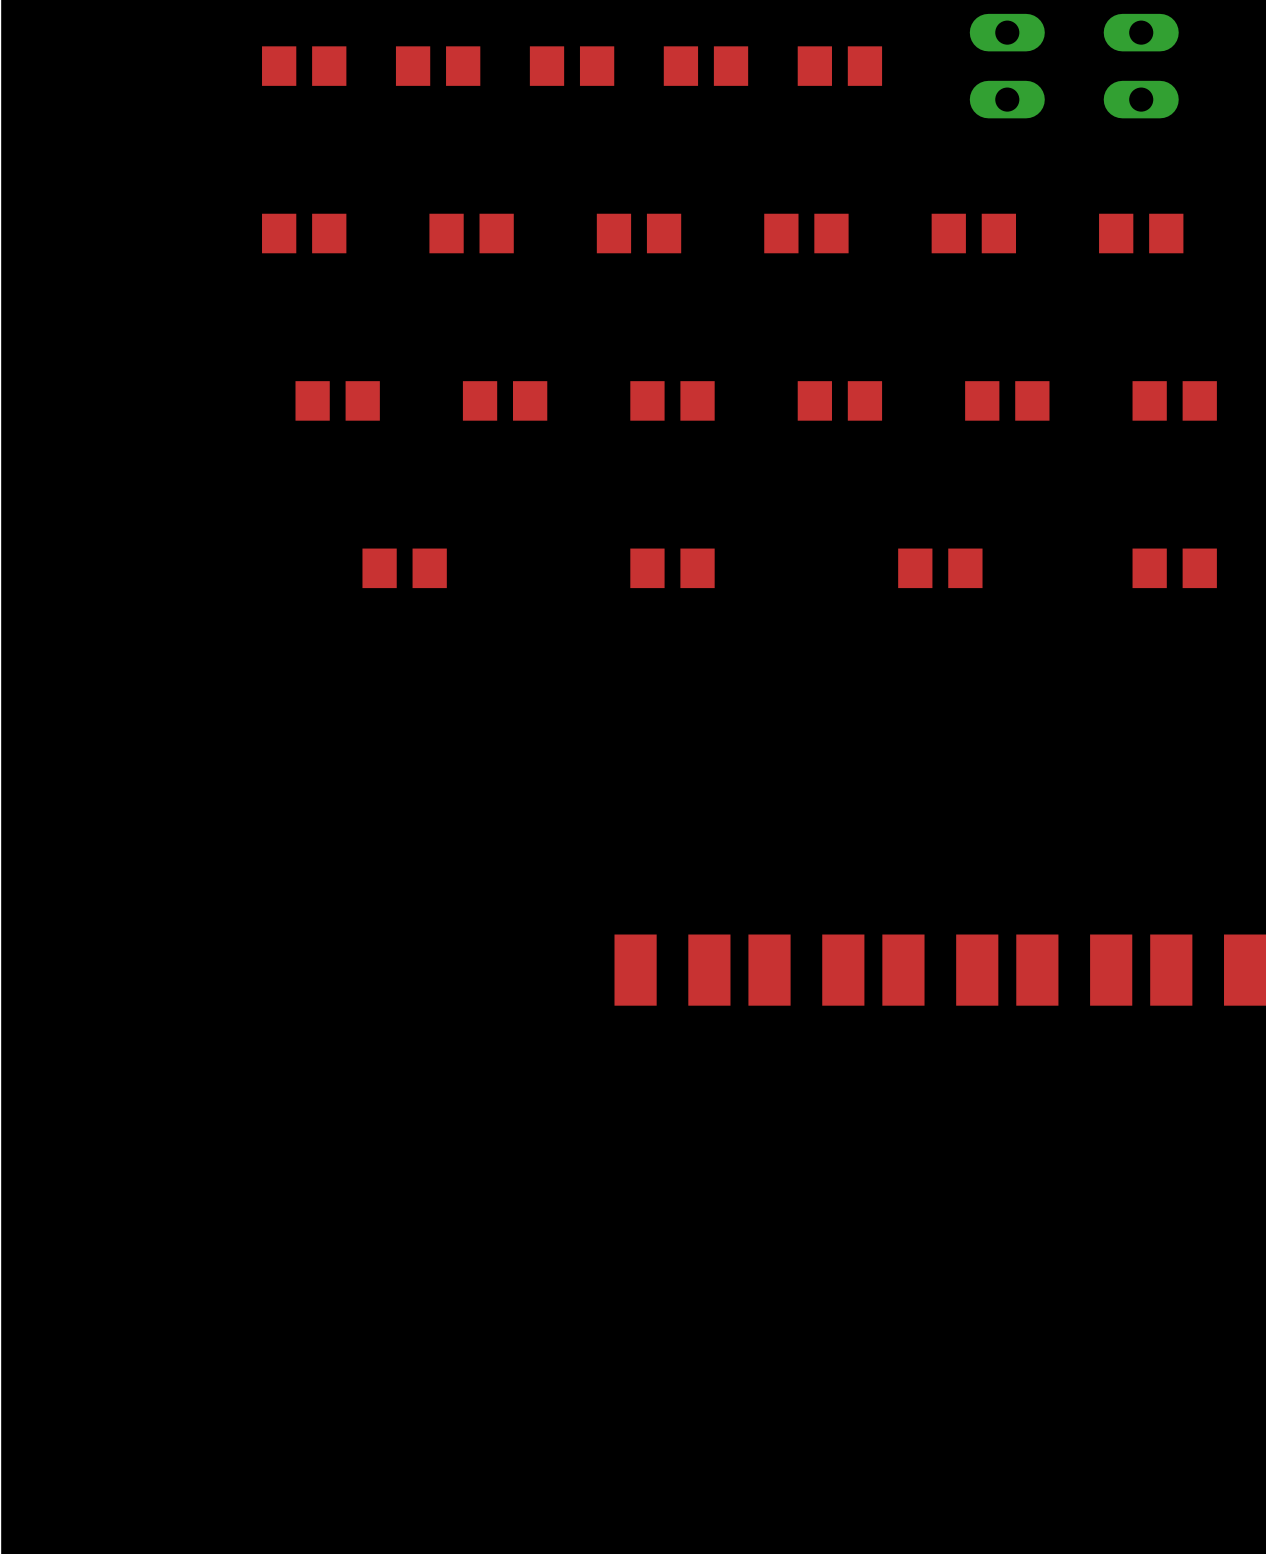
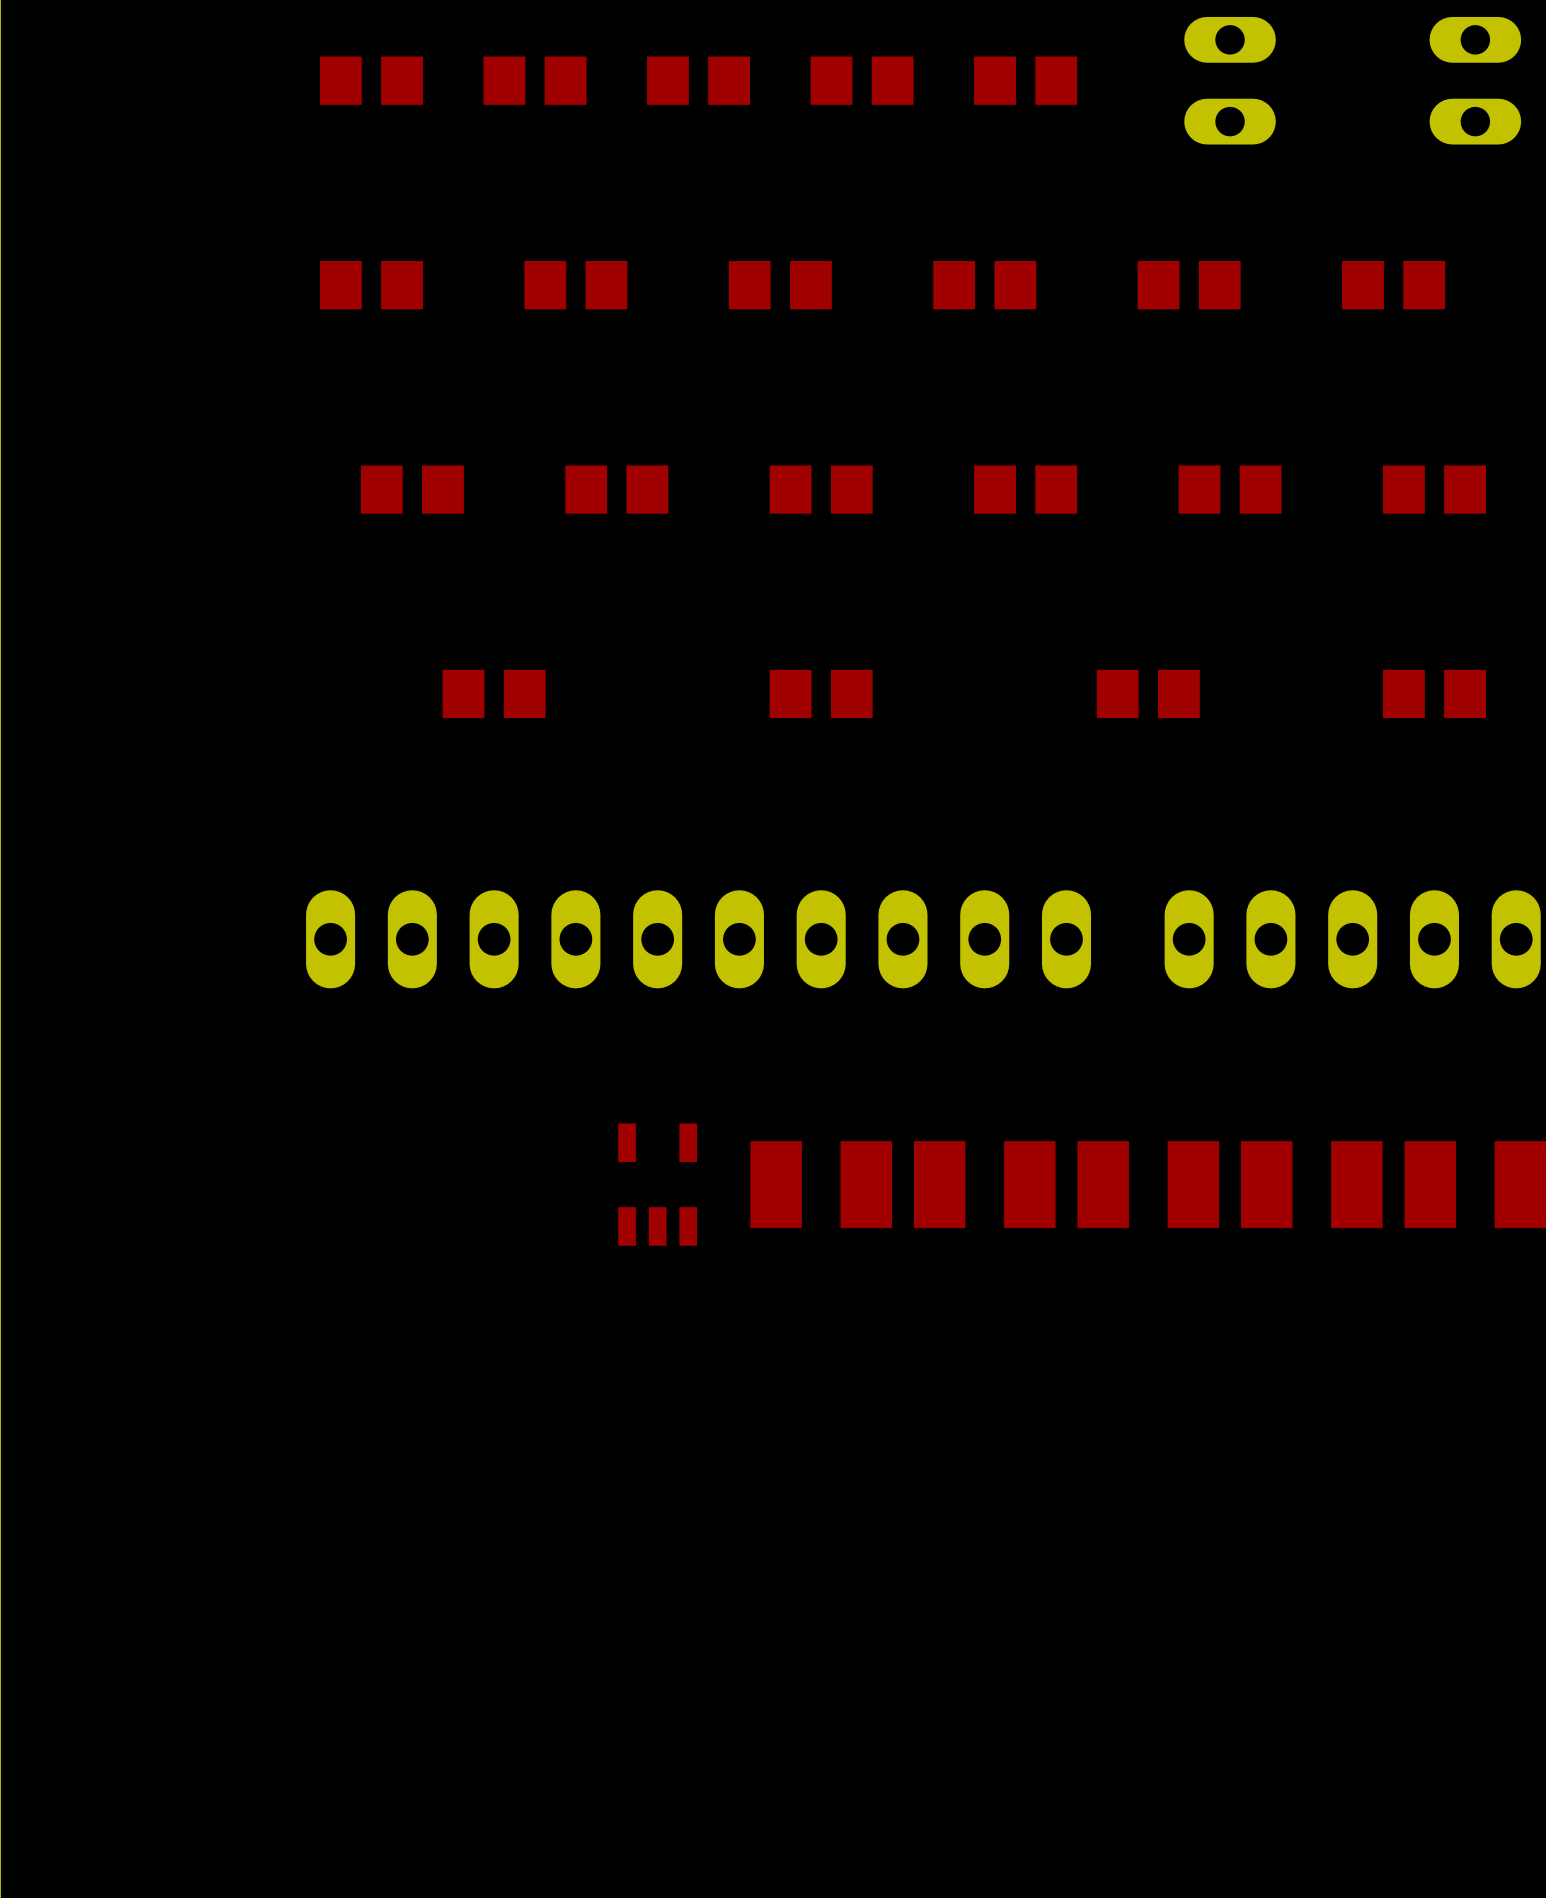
part position: (1141, 66) -> (1475, 80)
part: none -> (698, 939)
part: none -> (1352, 939)
part: none -> (657, 1184)

